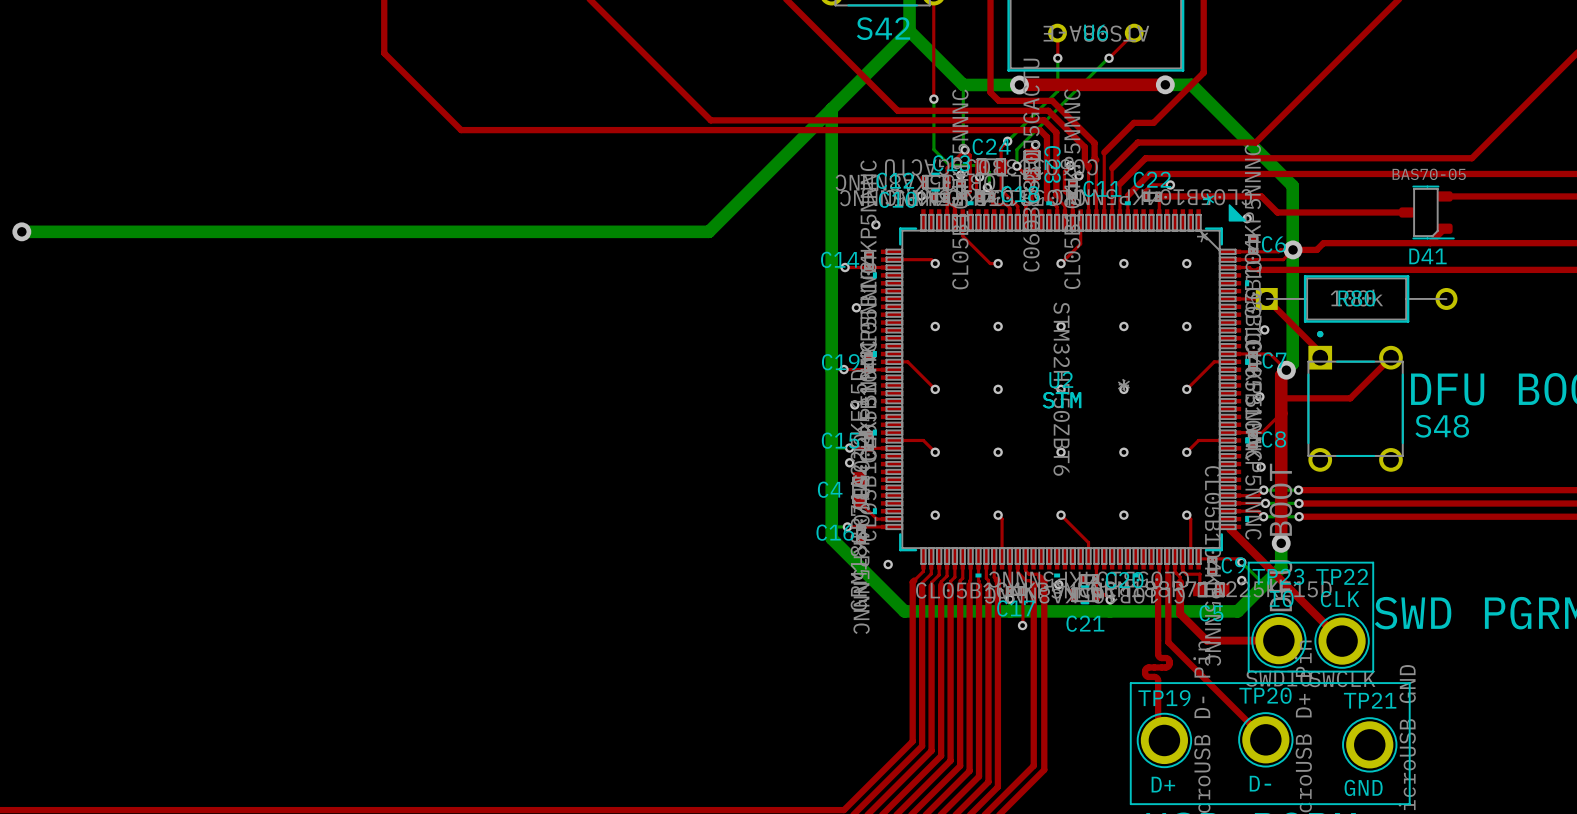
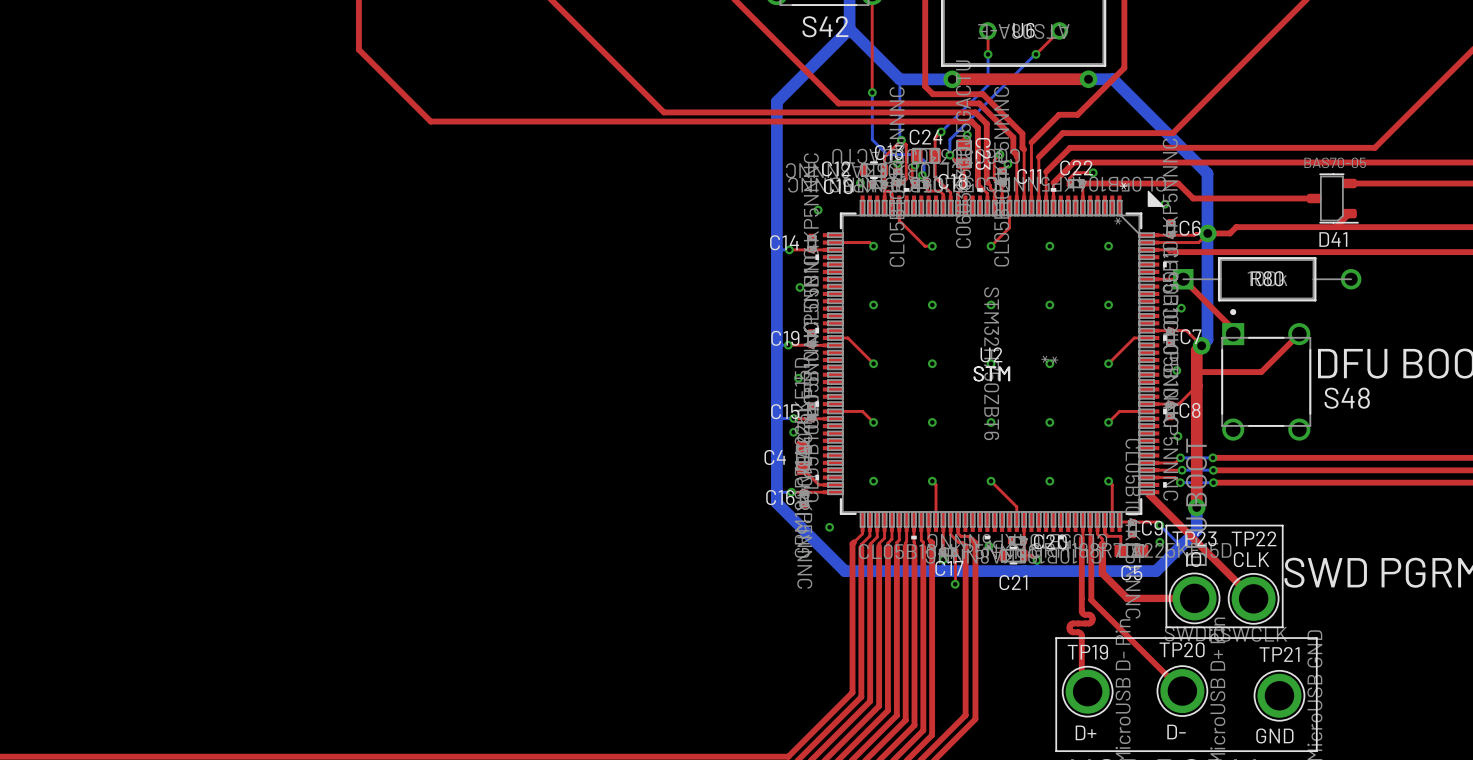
bottom track: (831, 109) (708, 231) (21, 231) -> none
via: (21, 231) -> none

